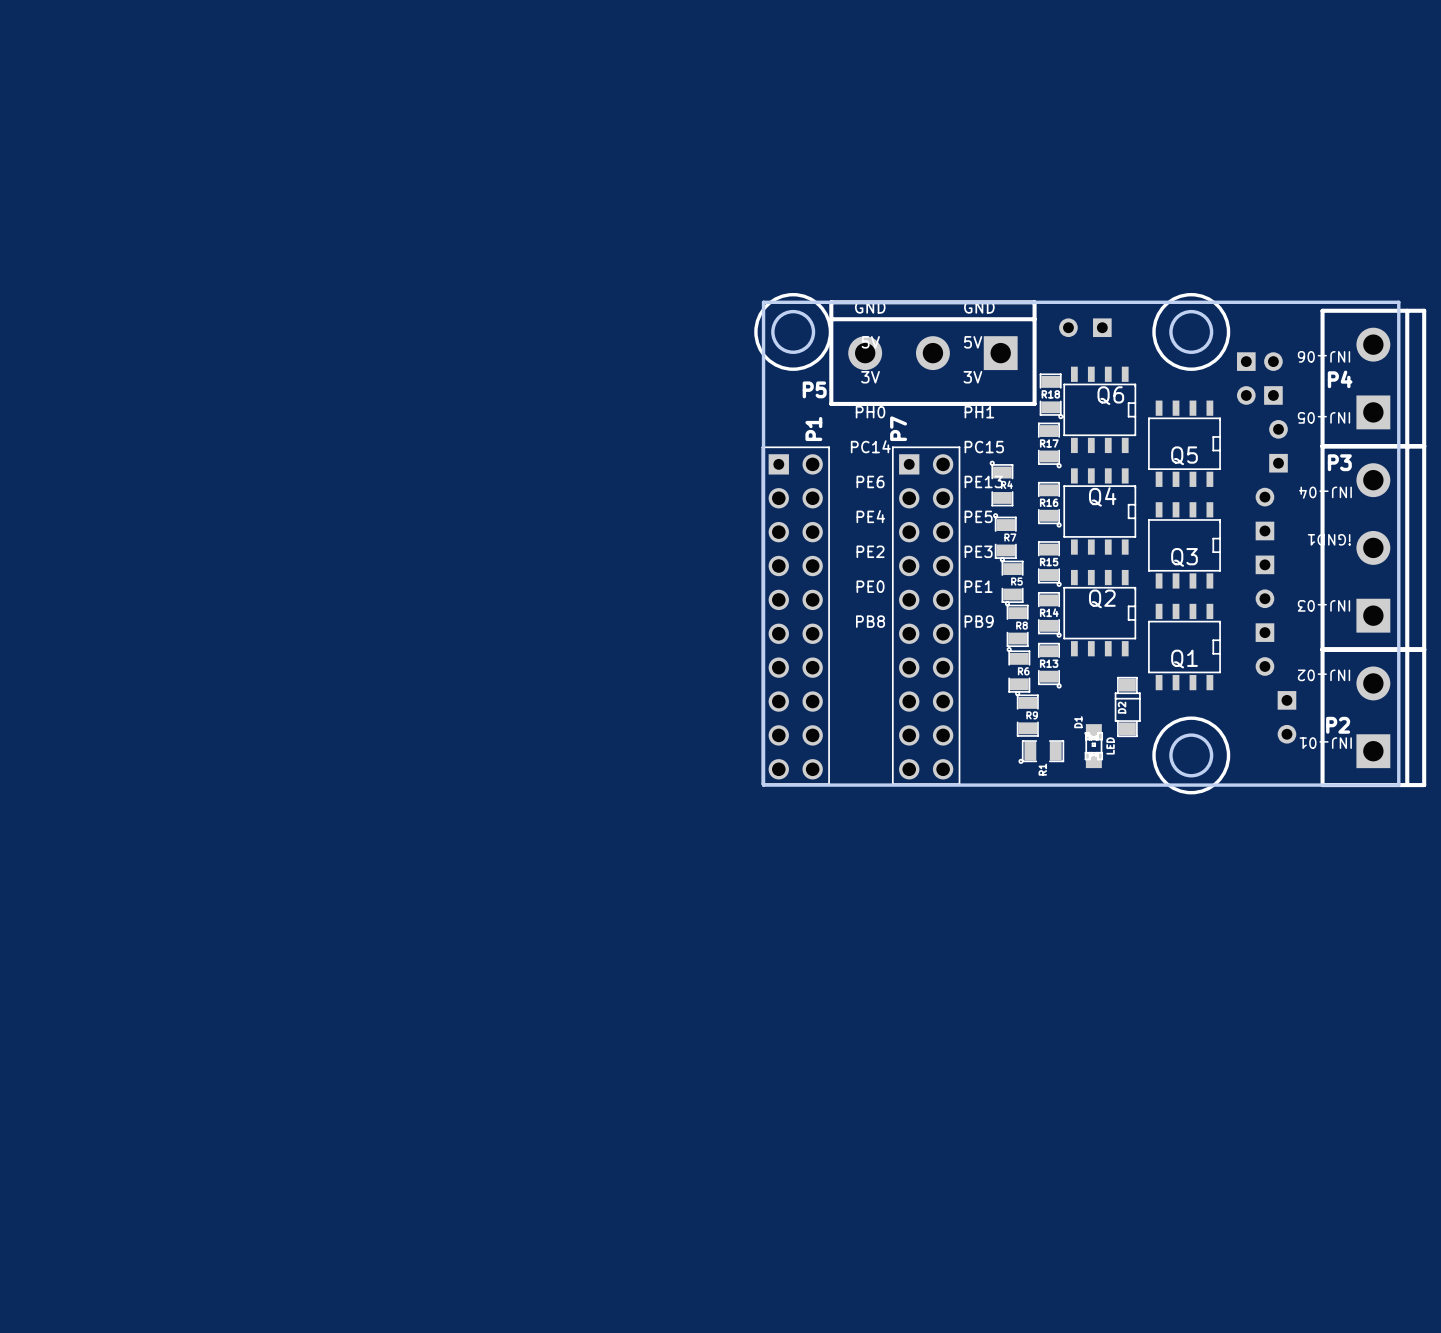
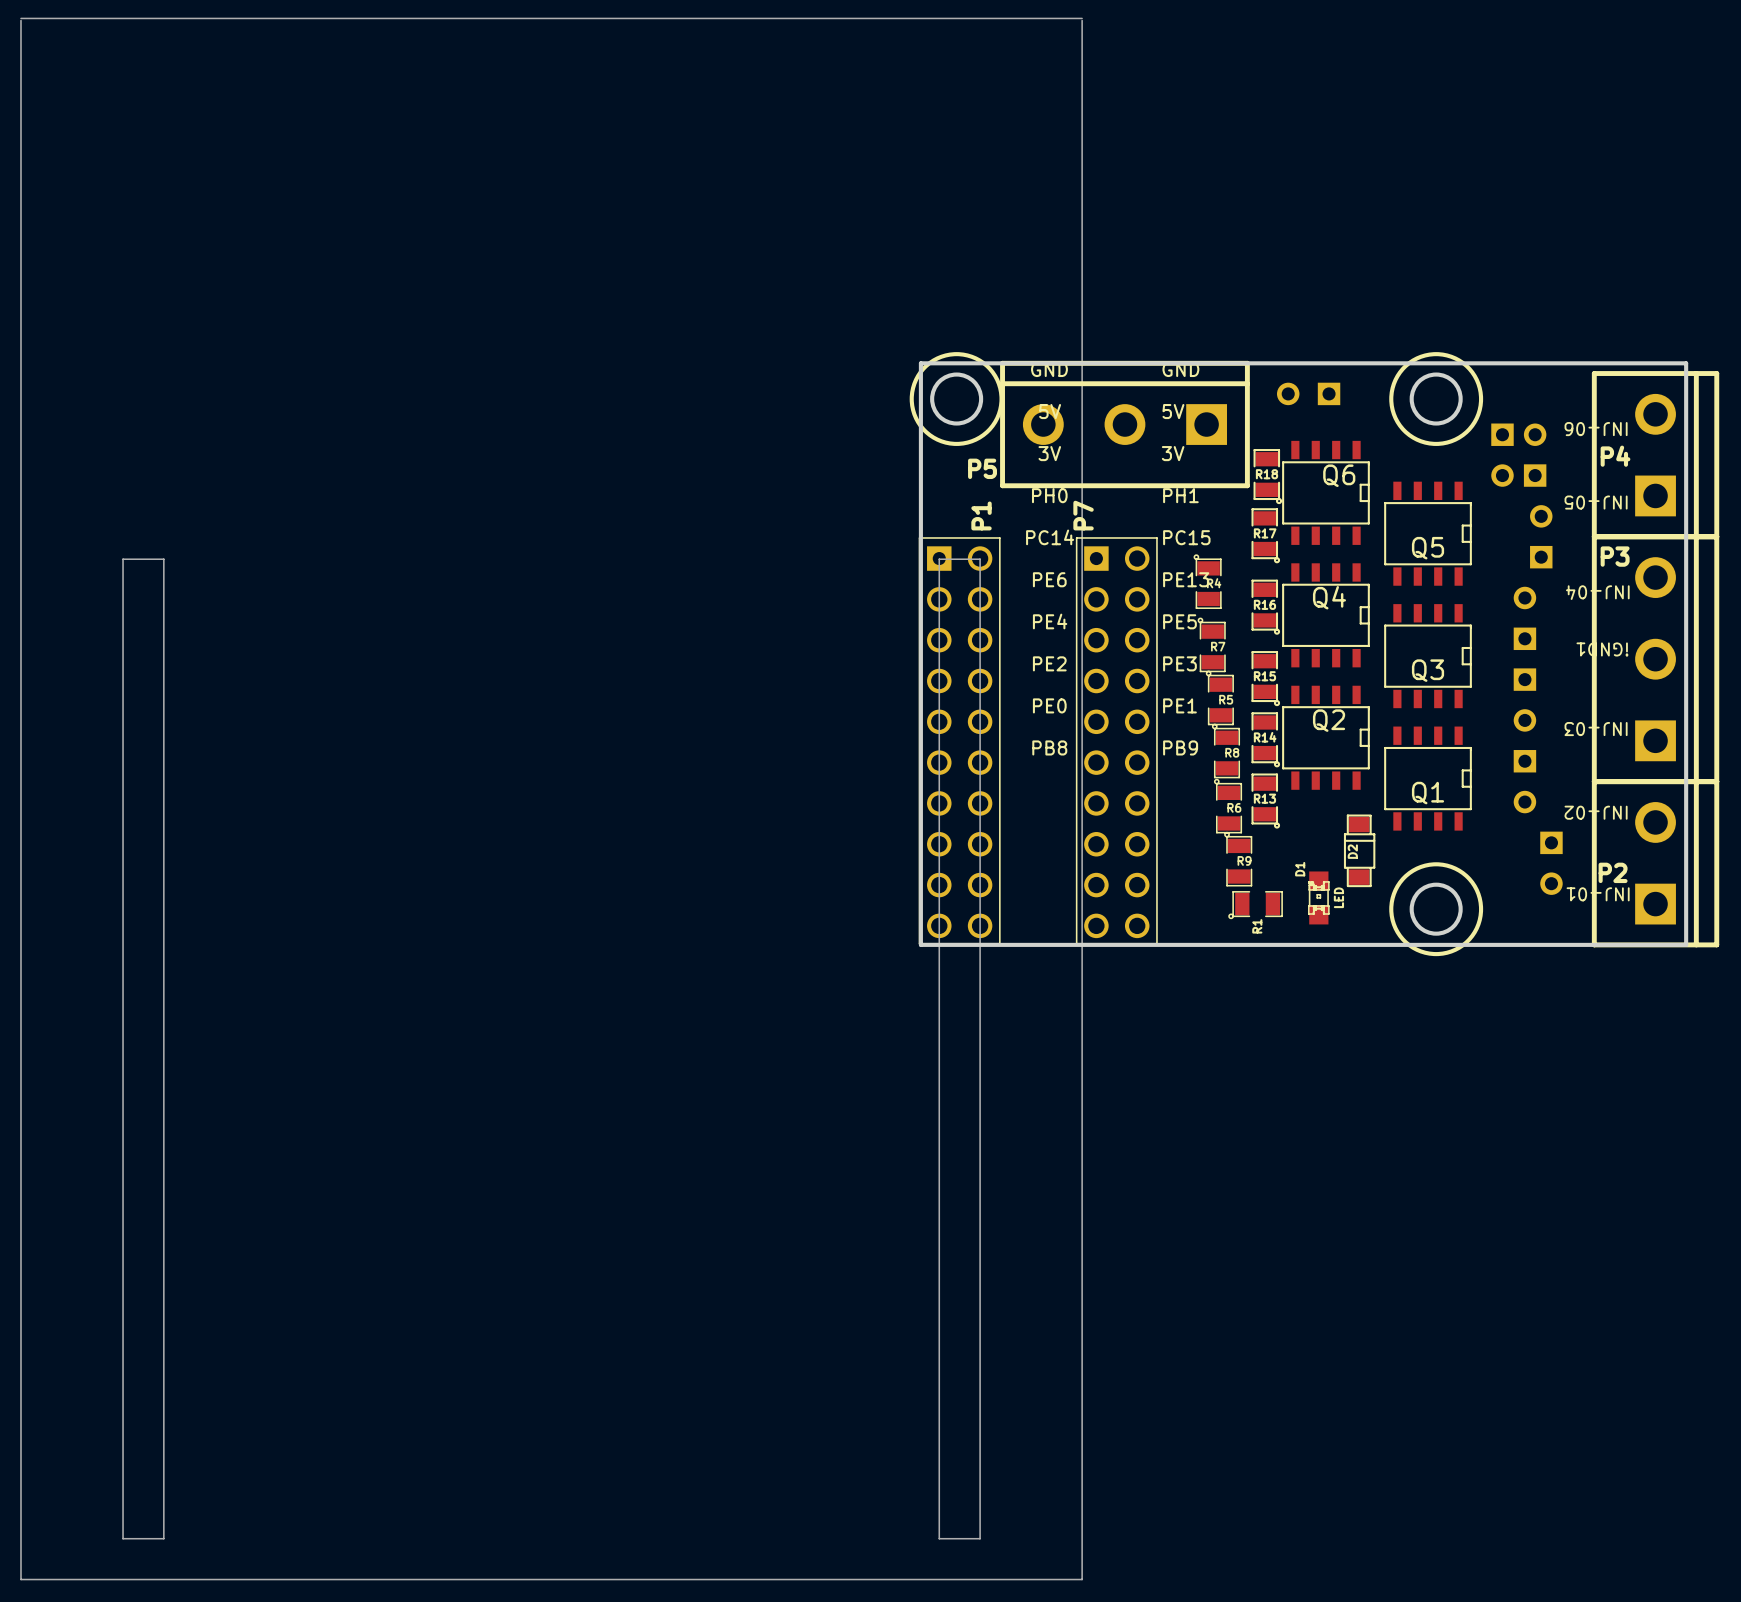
line: none -> (20, 18) (1082, 18)
line: none -> (20, 20) (20, 1579) (1082, 1579) (1082, 20)
line: none -> (123, 559) (163, 559) (163, 1538) (123, 1538) (123, 559)
line: none -> (939, 559) (980, 559) (980, 1538) (939, 1538) (939, 559)

